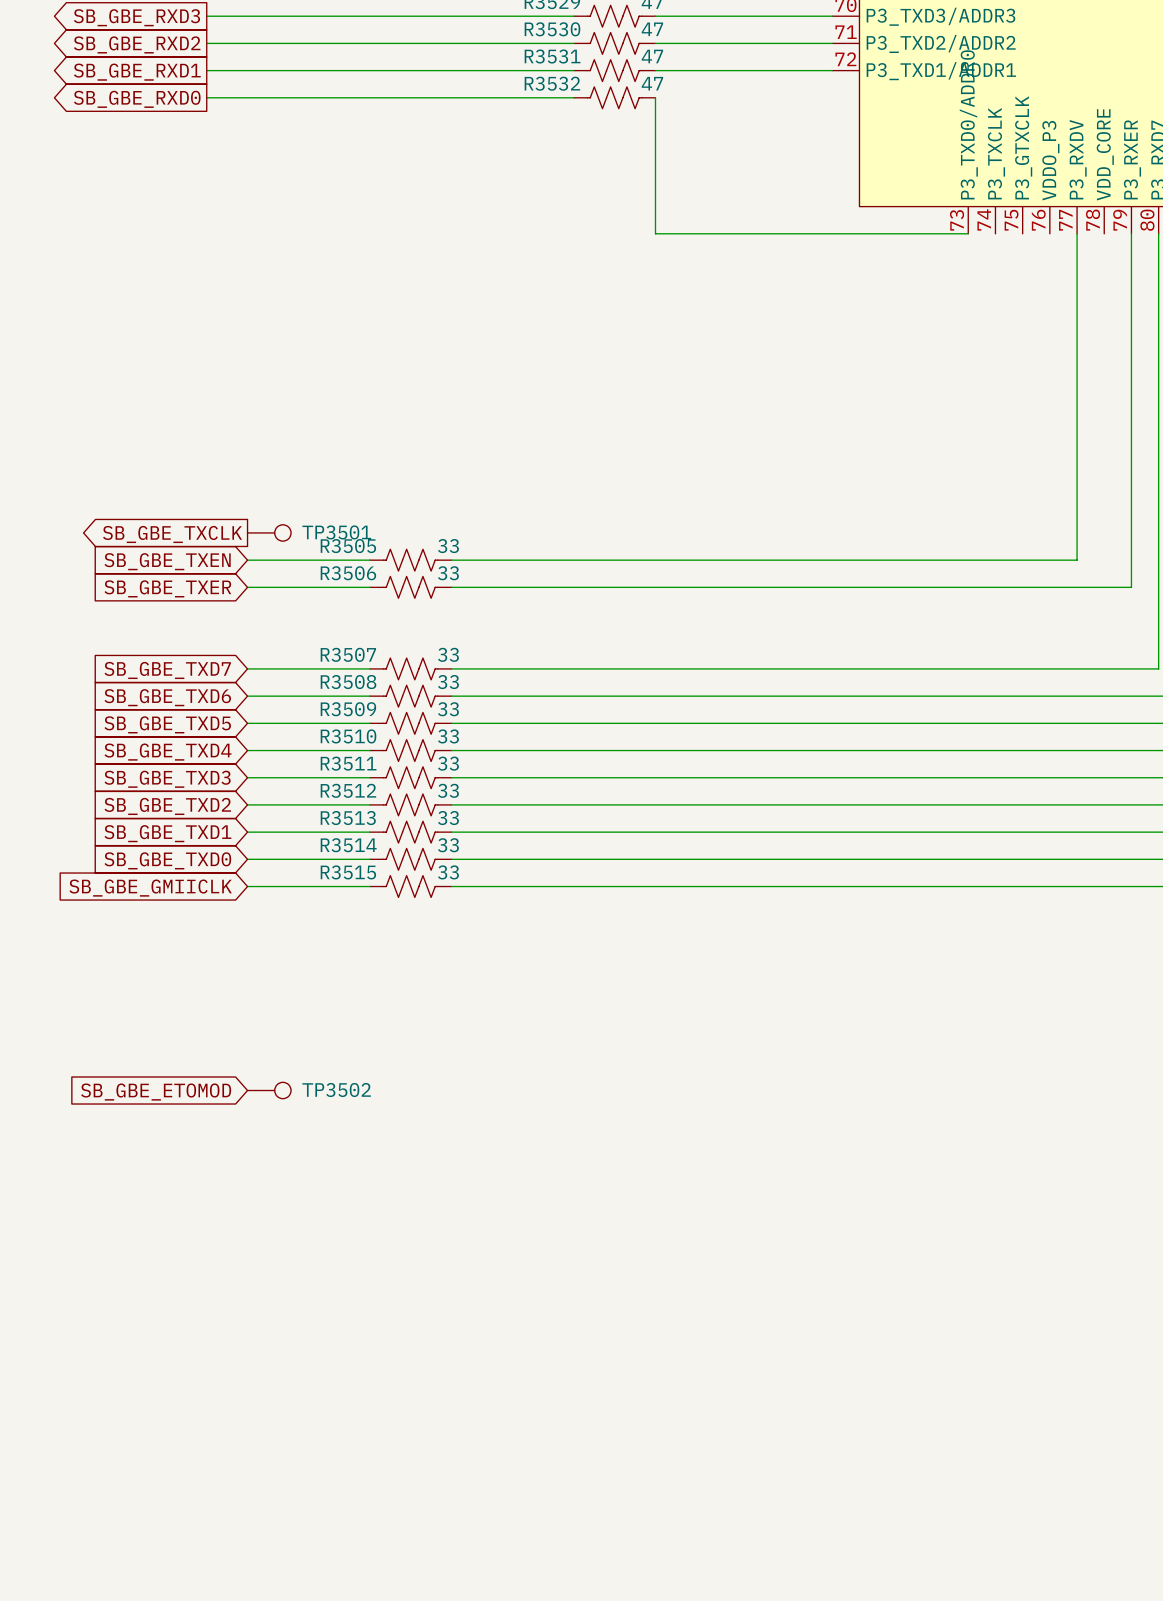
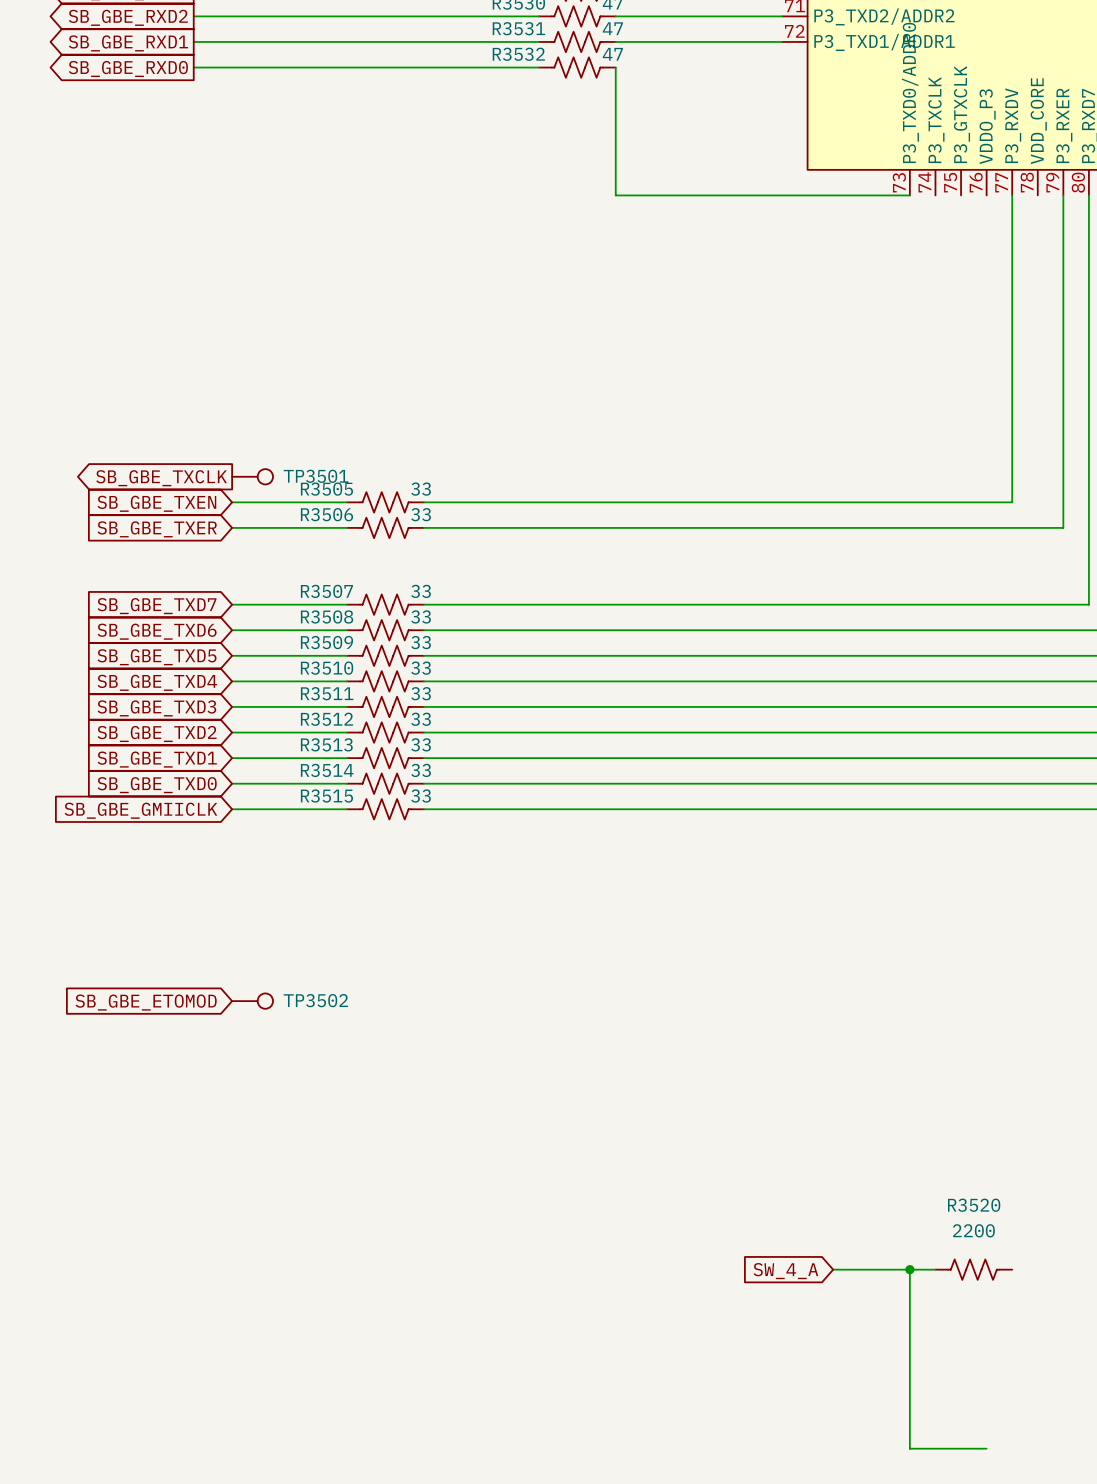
wire: none -> (833, 1269) (935, 1269)
wire: none -> (909, 1269) (909, 1448) (986, 1448)
junction: none -> (909, 1269)
R3520: none -> 2200 (973, 1269)
global label: none -> SW_4_A (785, 1271)

